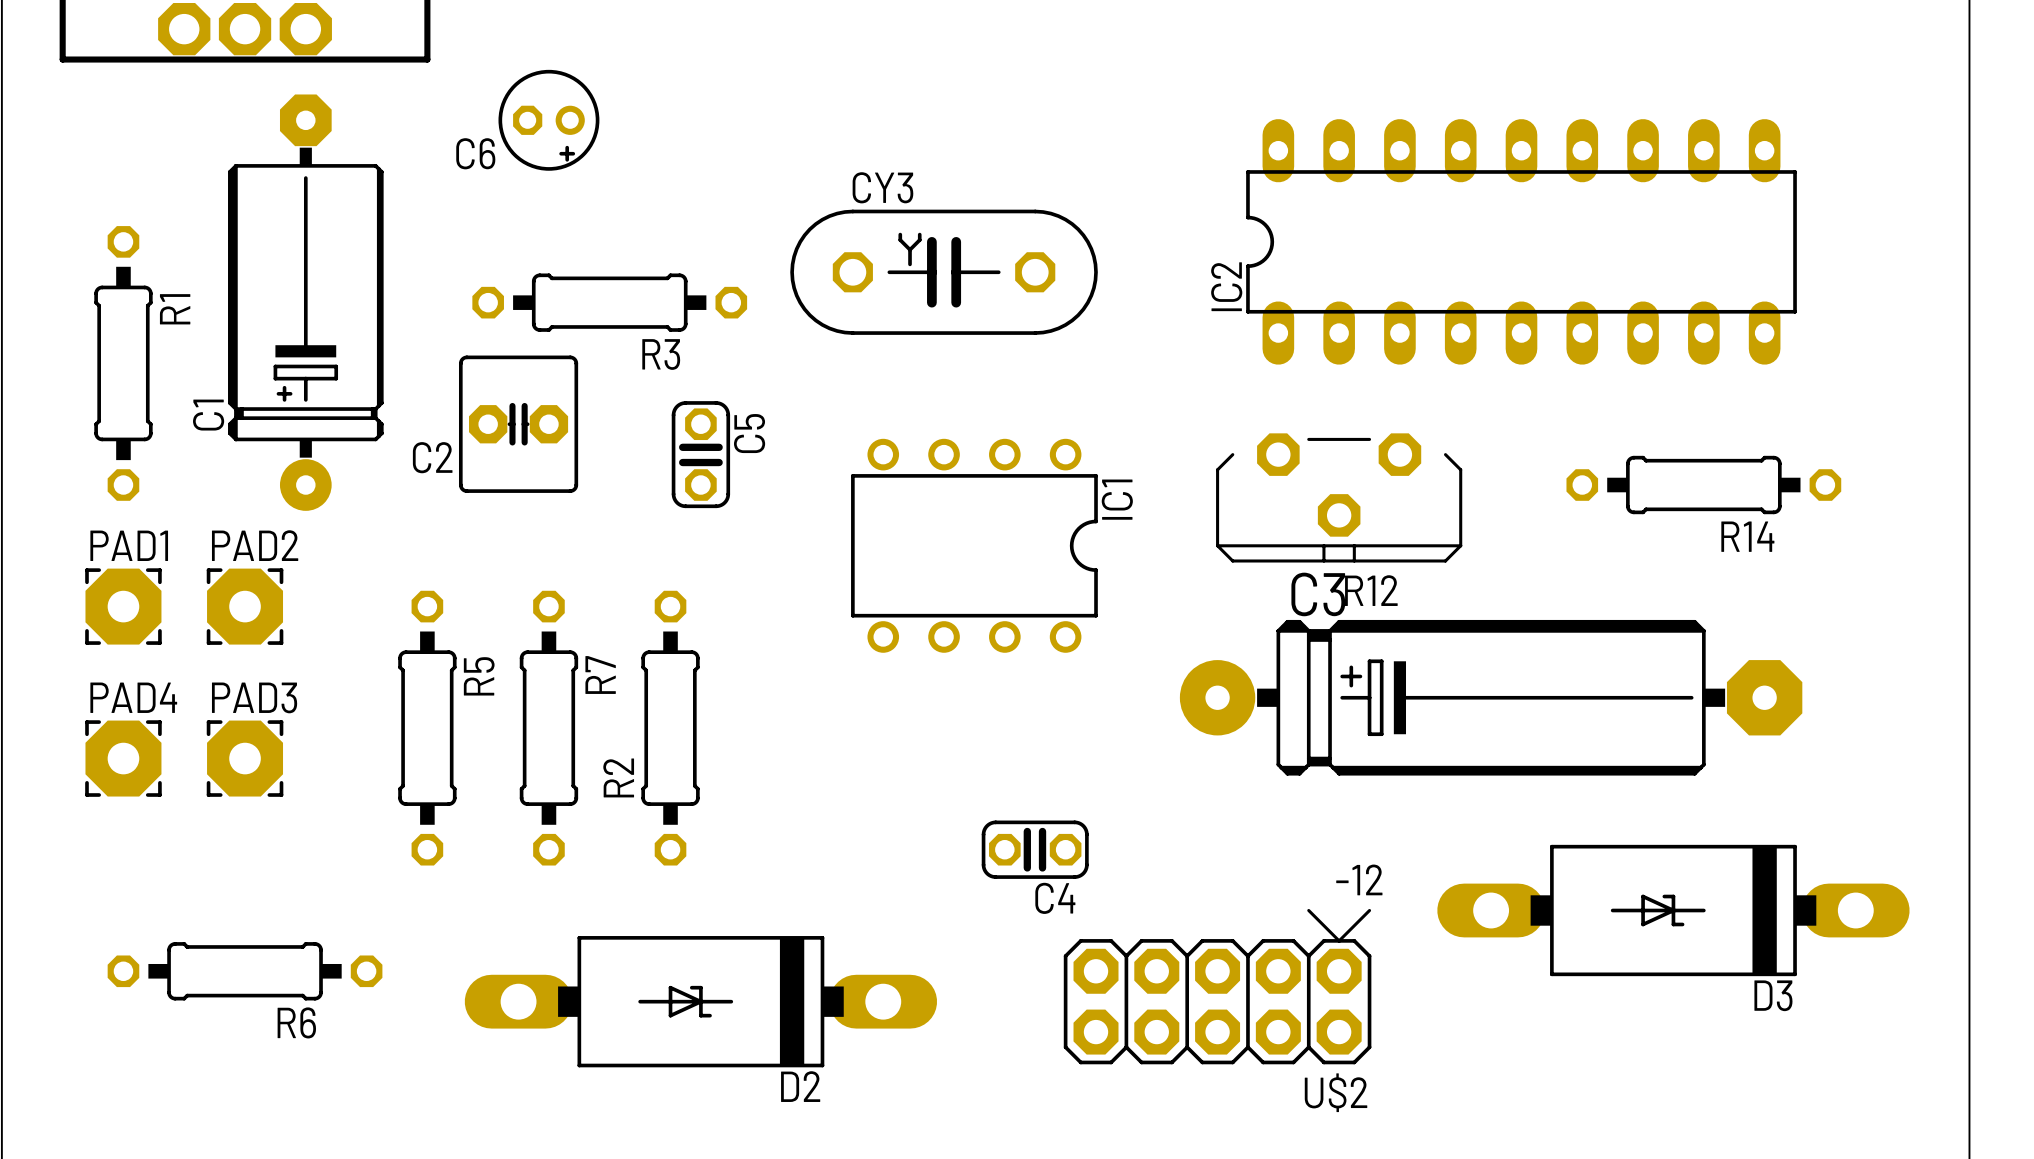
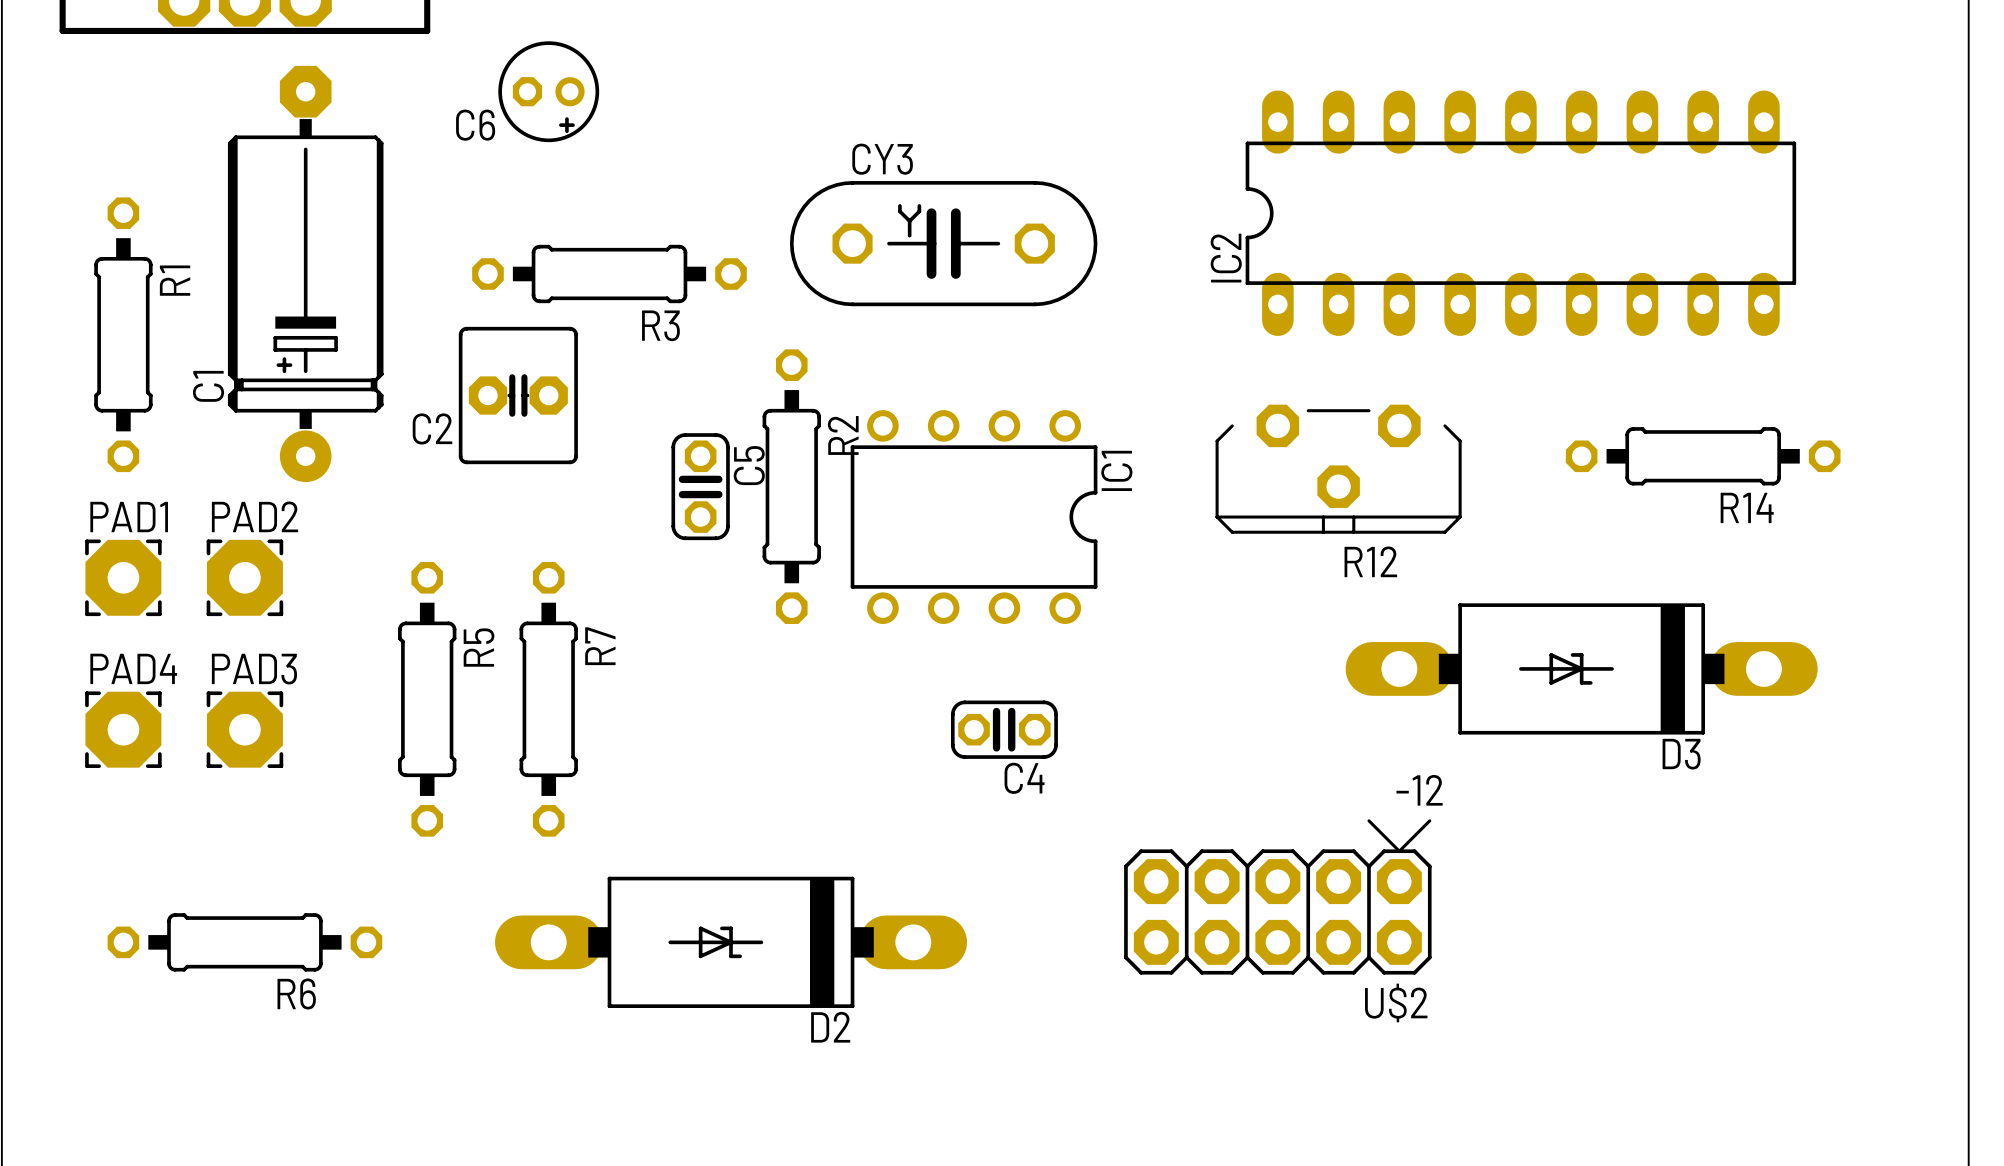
C5 position: (700, 454) -> (700, 486)
C3: (1491, 697) -> none
R2 position: (670, 728) -> (791, 486)
R2 name position: R2 (618, 777) -> R2 (843, 435)
C4 position: (1035, 849) -> (1004, 729)
D3 position: (1673, 910) -> (1581, 668)
U$2 position: (1217, 986) -> (1277, 896)
D2 position: (700, 1001) -> (731, 942)

